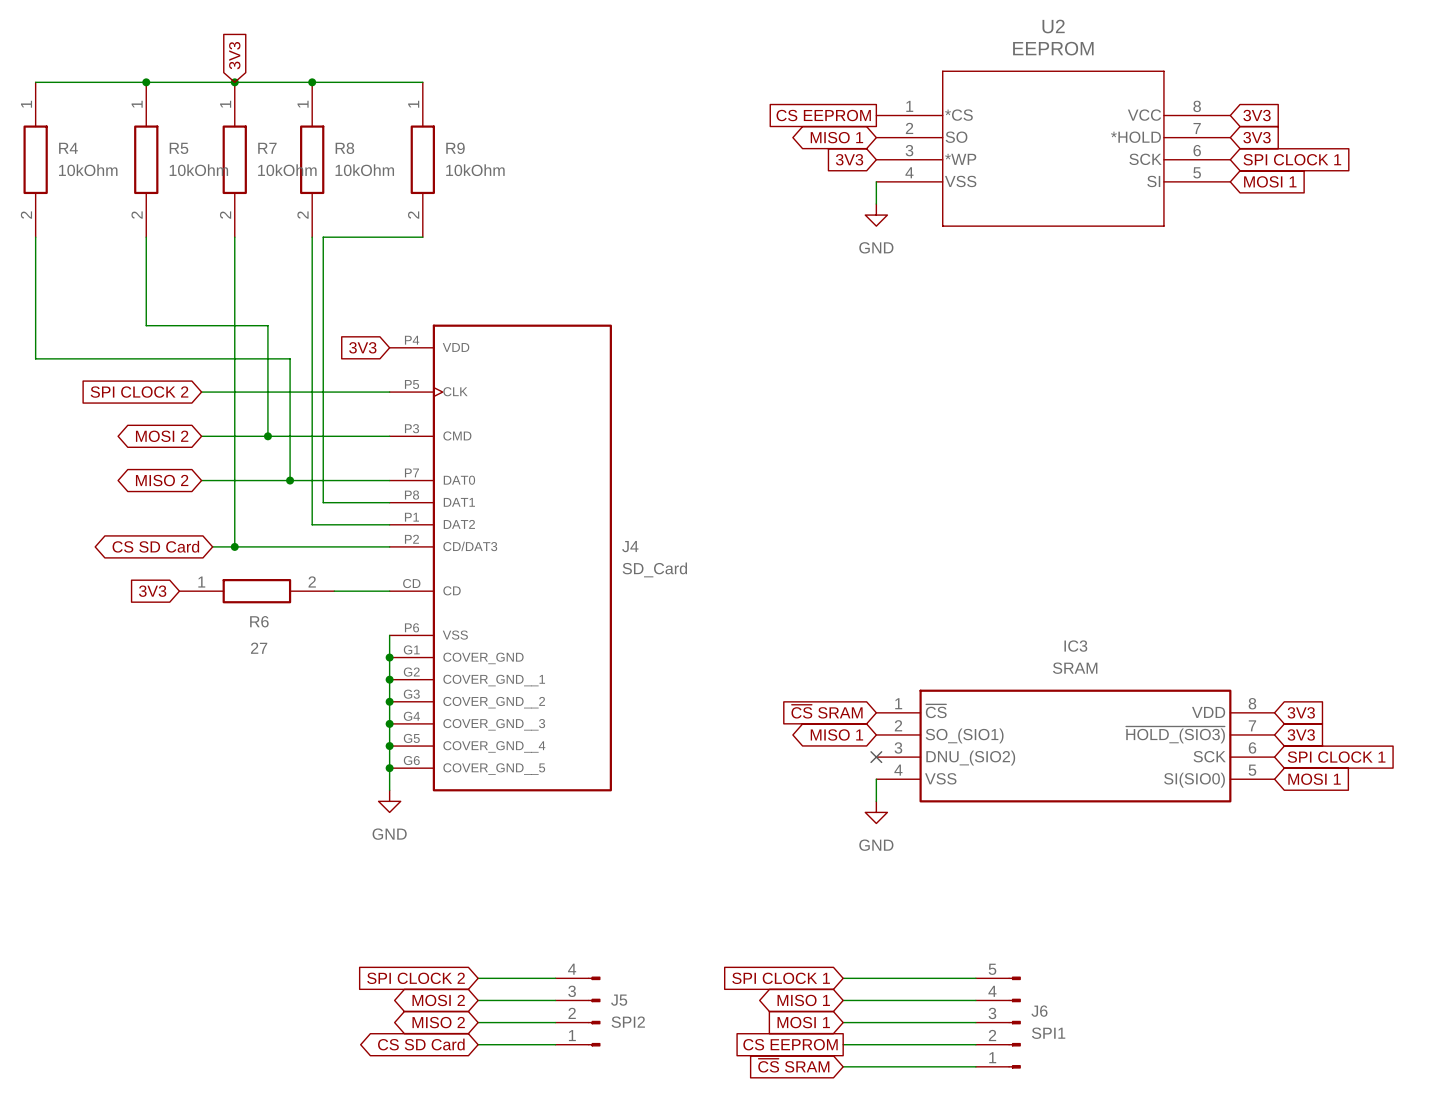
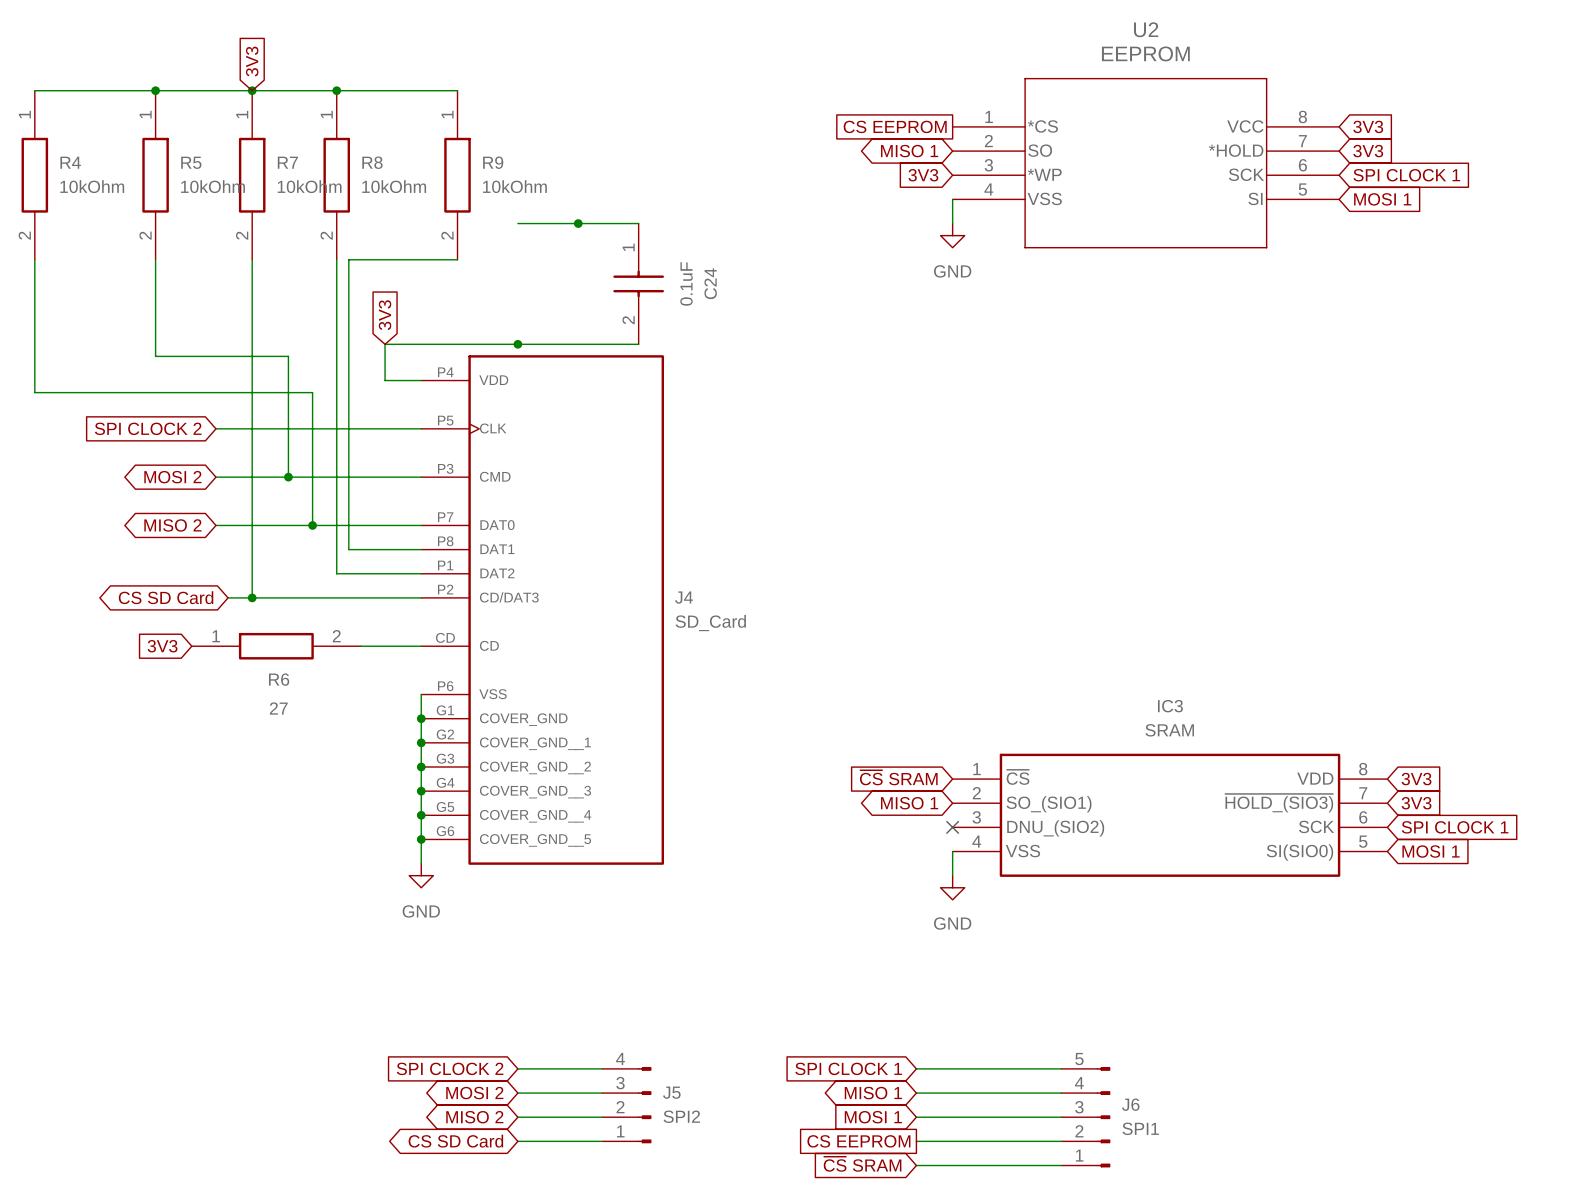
wire: none -> (517, 223) (638, 223)
junction: none -> (578, 223)
C24: none -> 0.1uF (638, 283)
junction: none -> (517, 344)
wire: none -> (638, 344) (385, 344) (385, 380) (421, 380)
global label rotation: 0° (362, 347) -> 90° clockwise (385, 315)
global label position: 3V3 (362, 347) -> 3V3 (385, 315)

